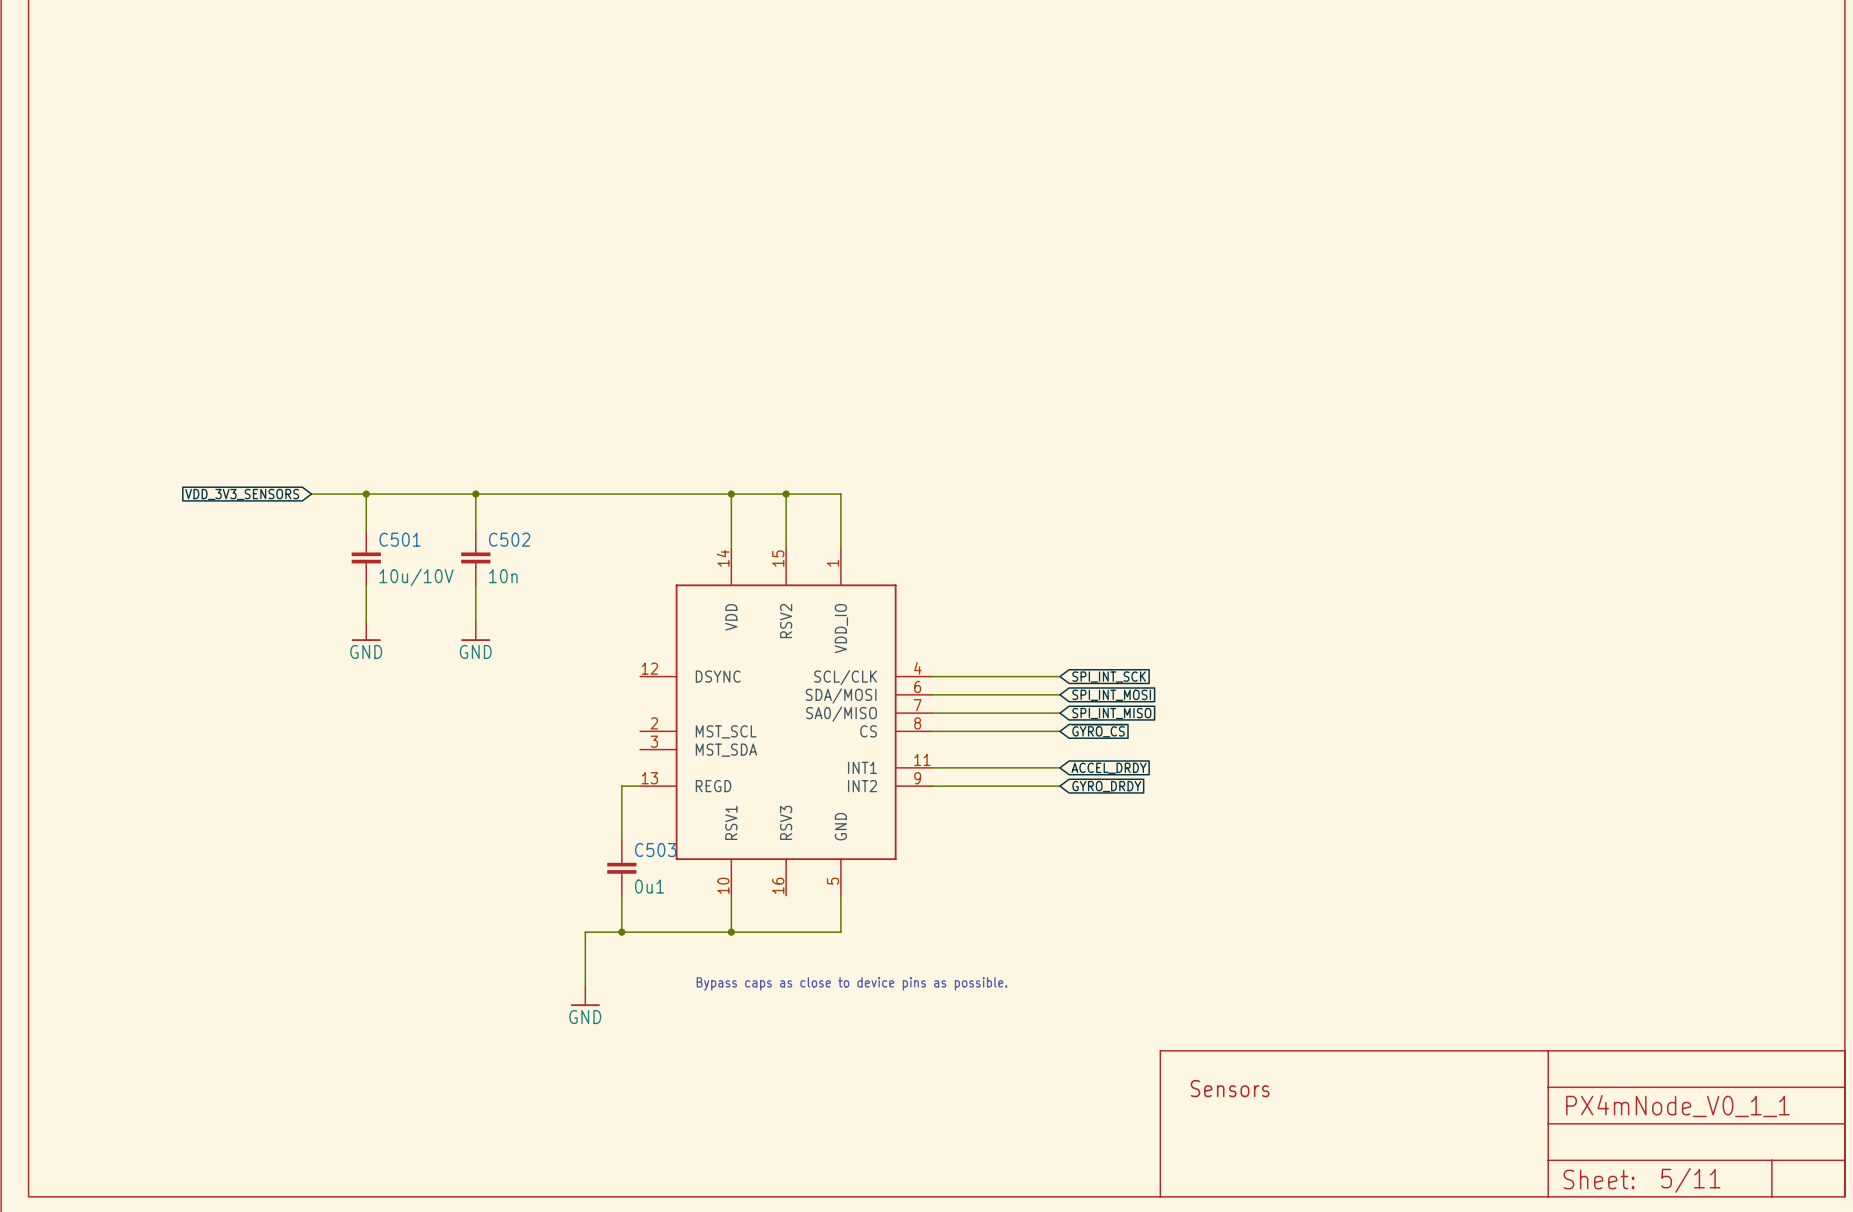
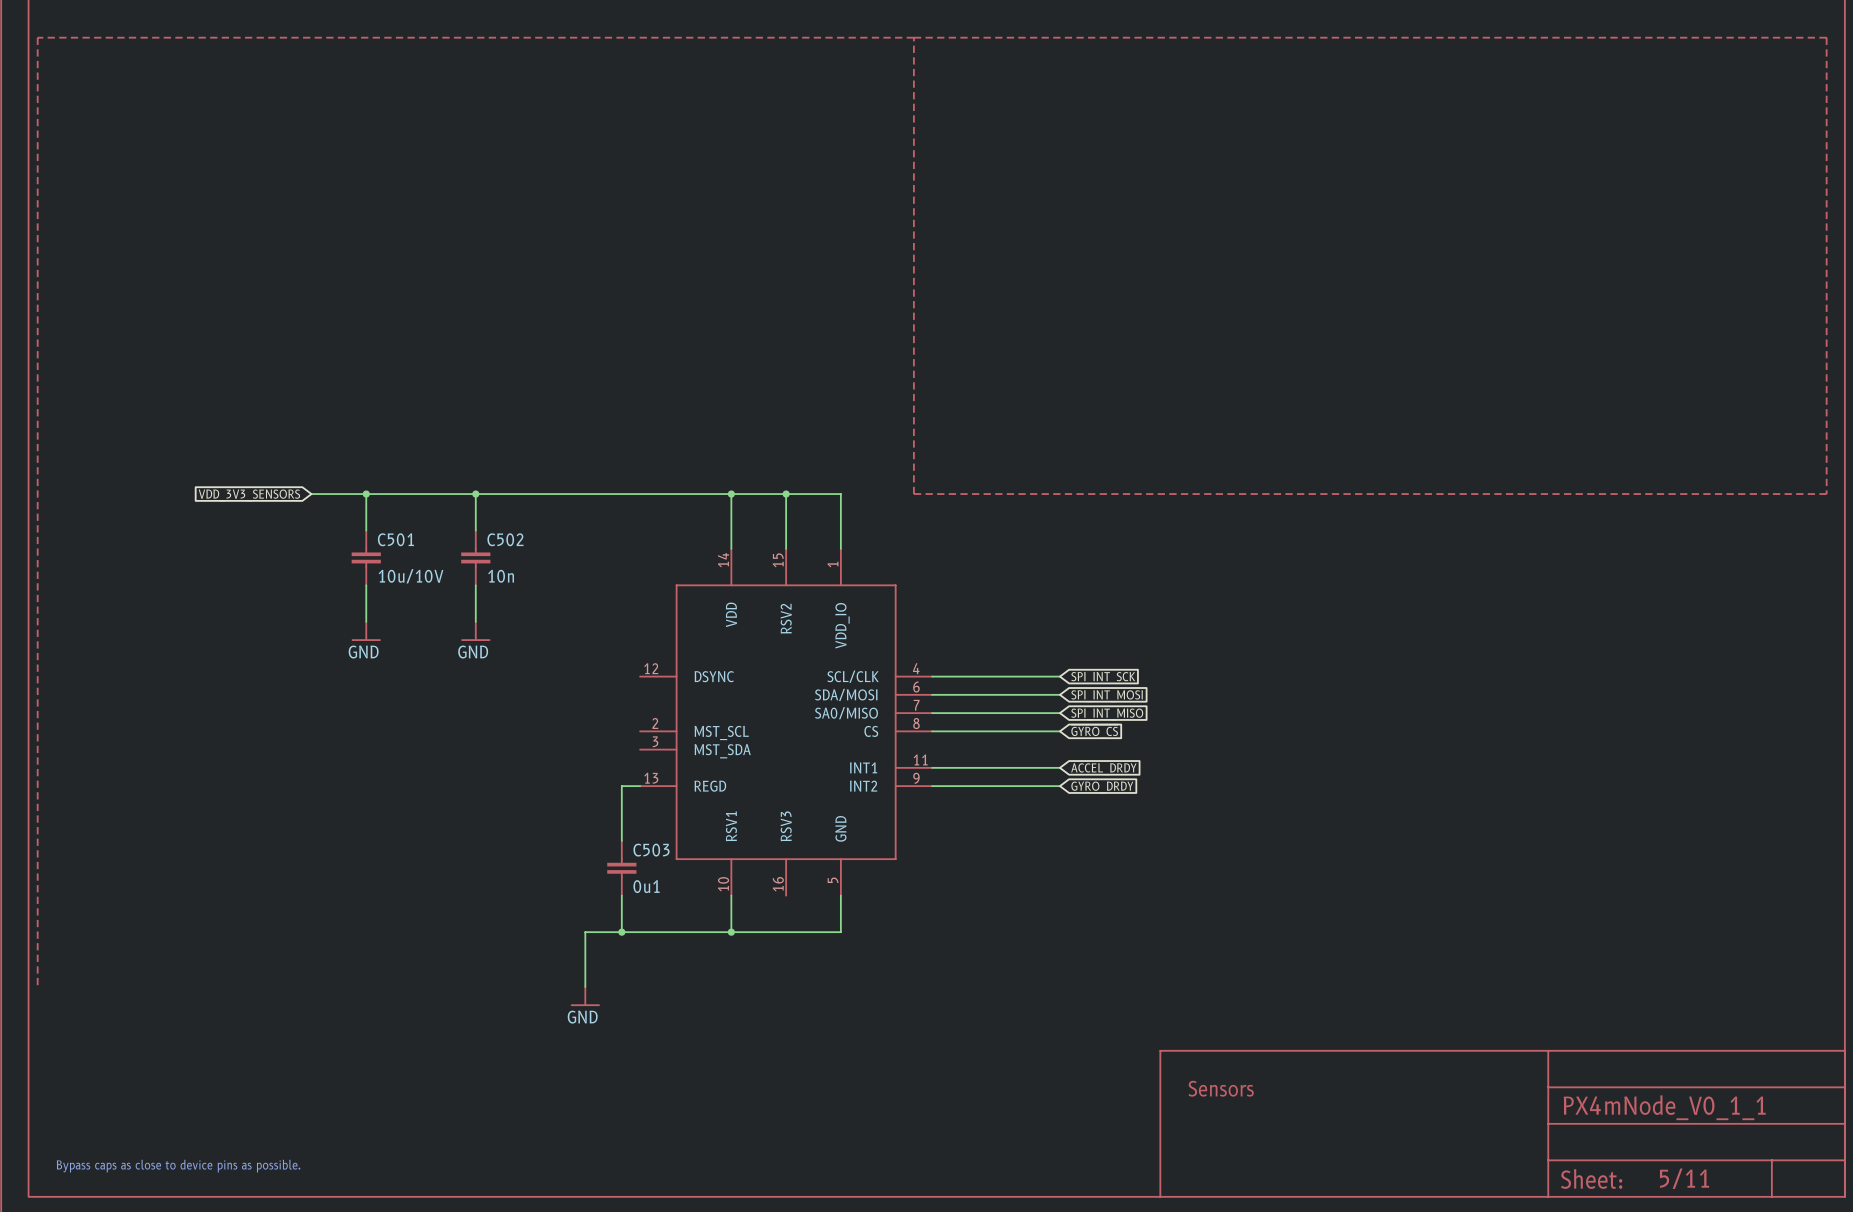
line: none -> (913, 37) (913, 494) (1826, 494) (1826, 37) (37, 37) (37, 986)
text: Bypass caps as close to device pins as possible. (851, 983) -> none
text: none -> Bypass caps as close to device pins as possible. (178, 1166)

